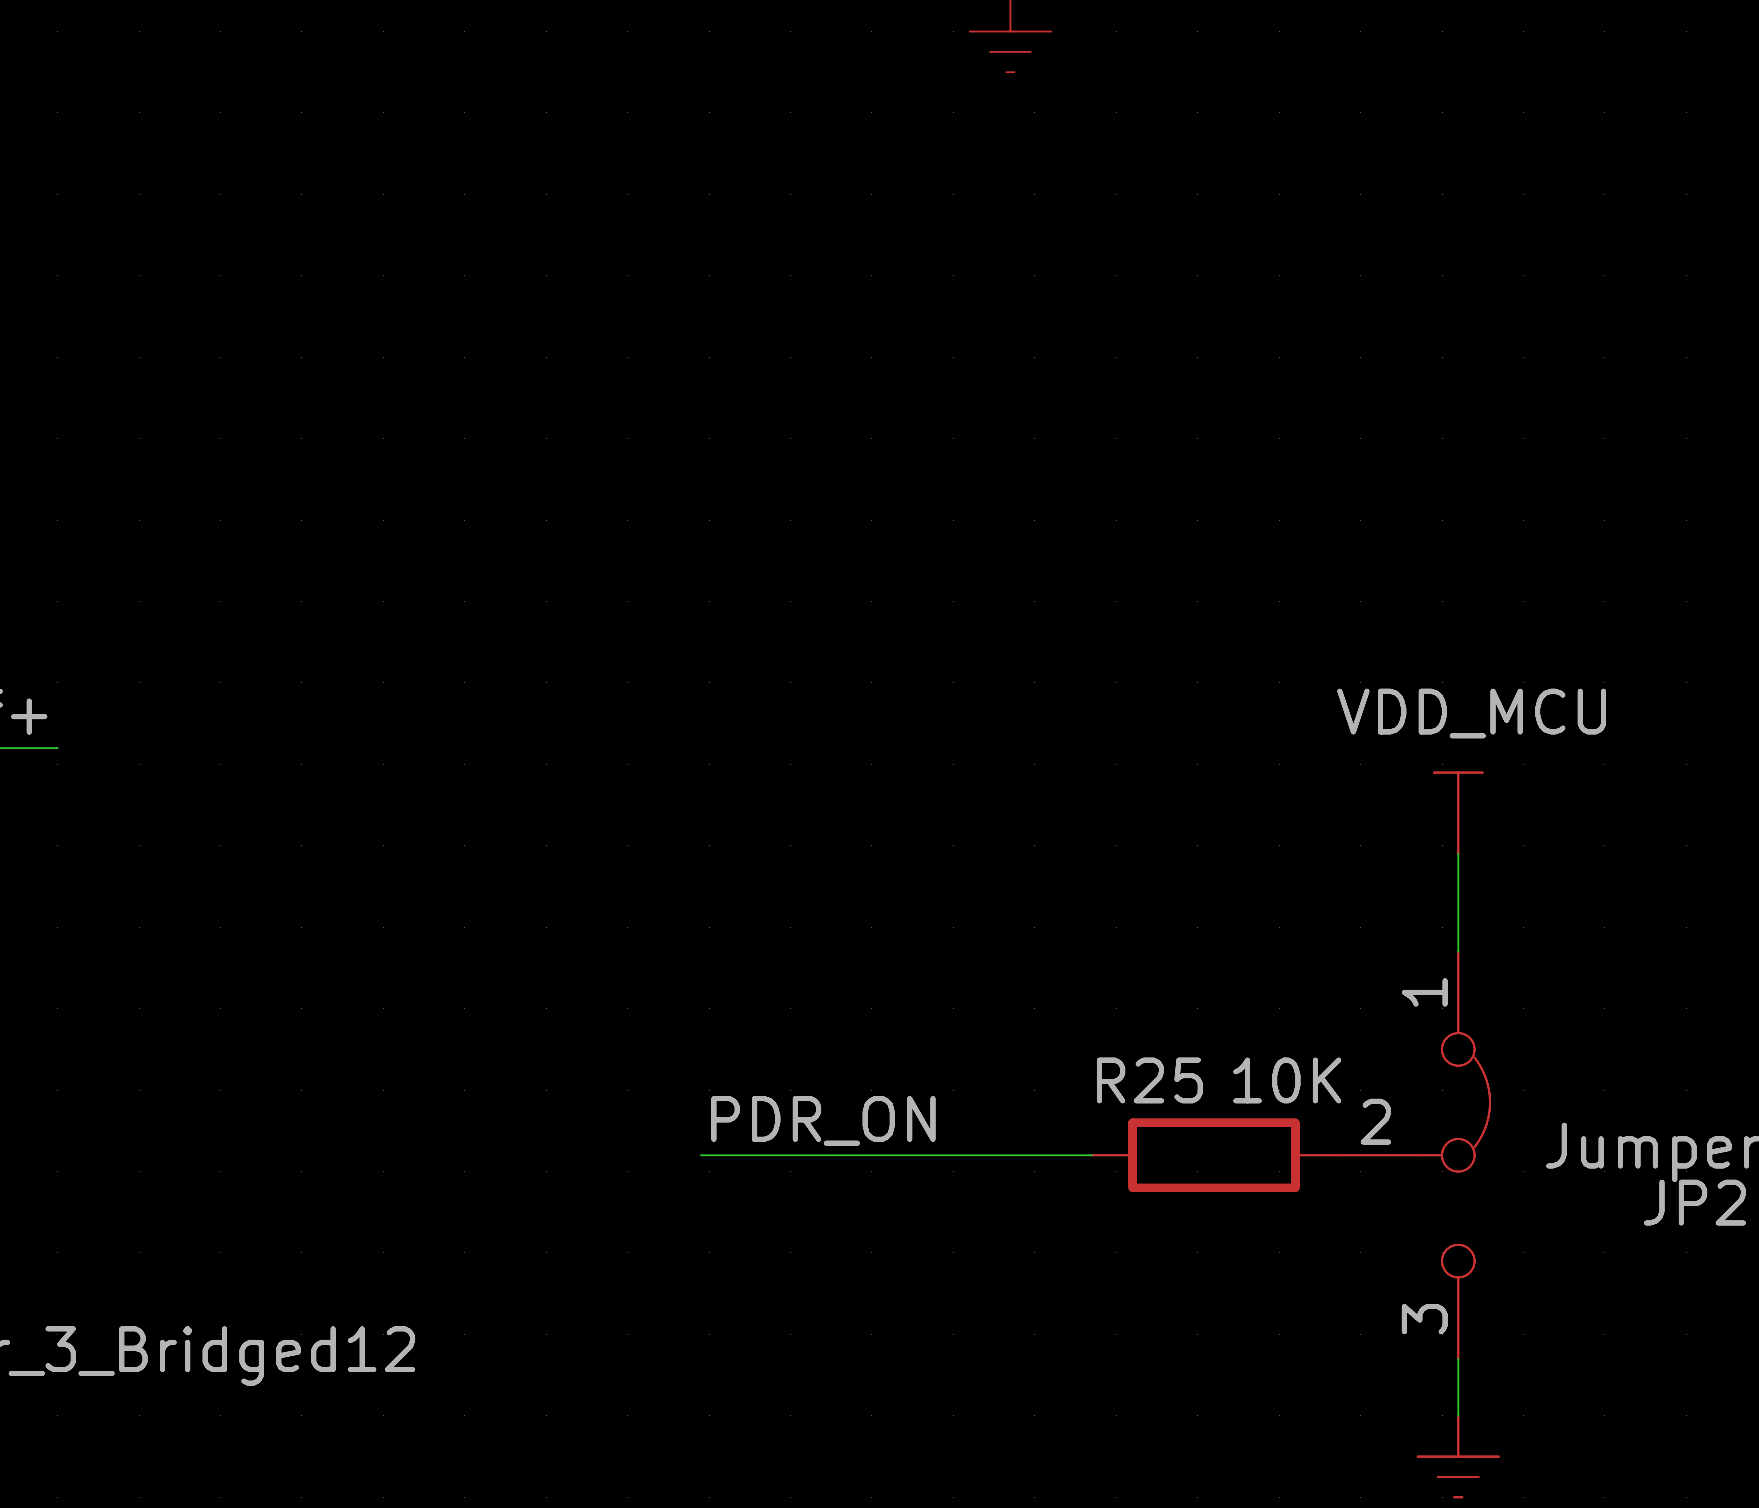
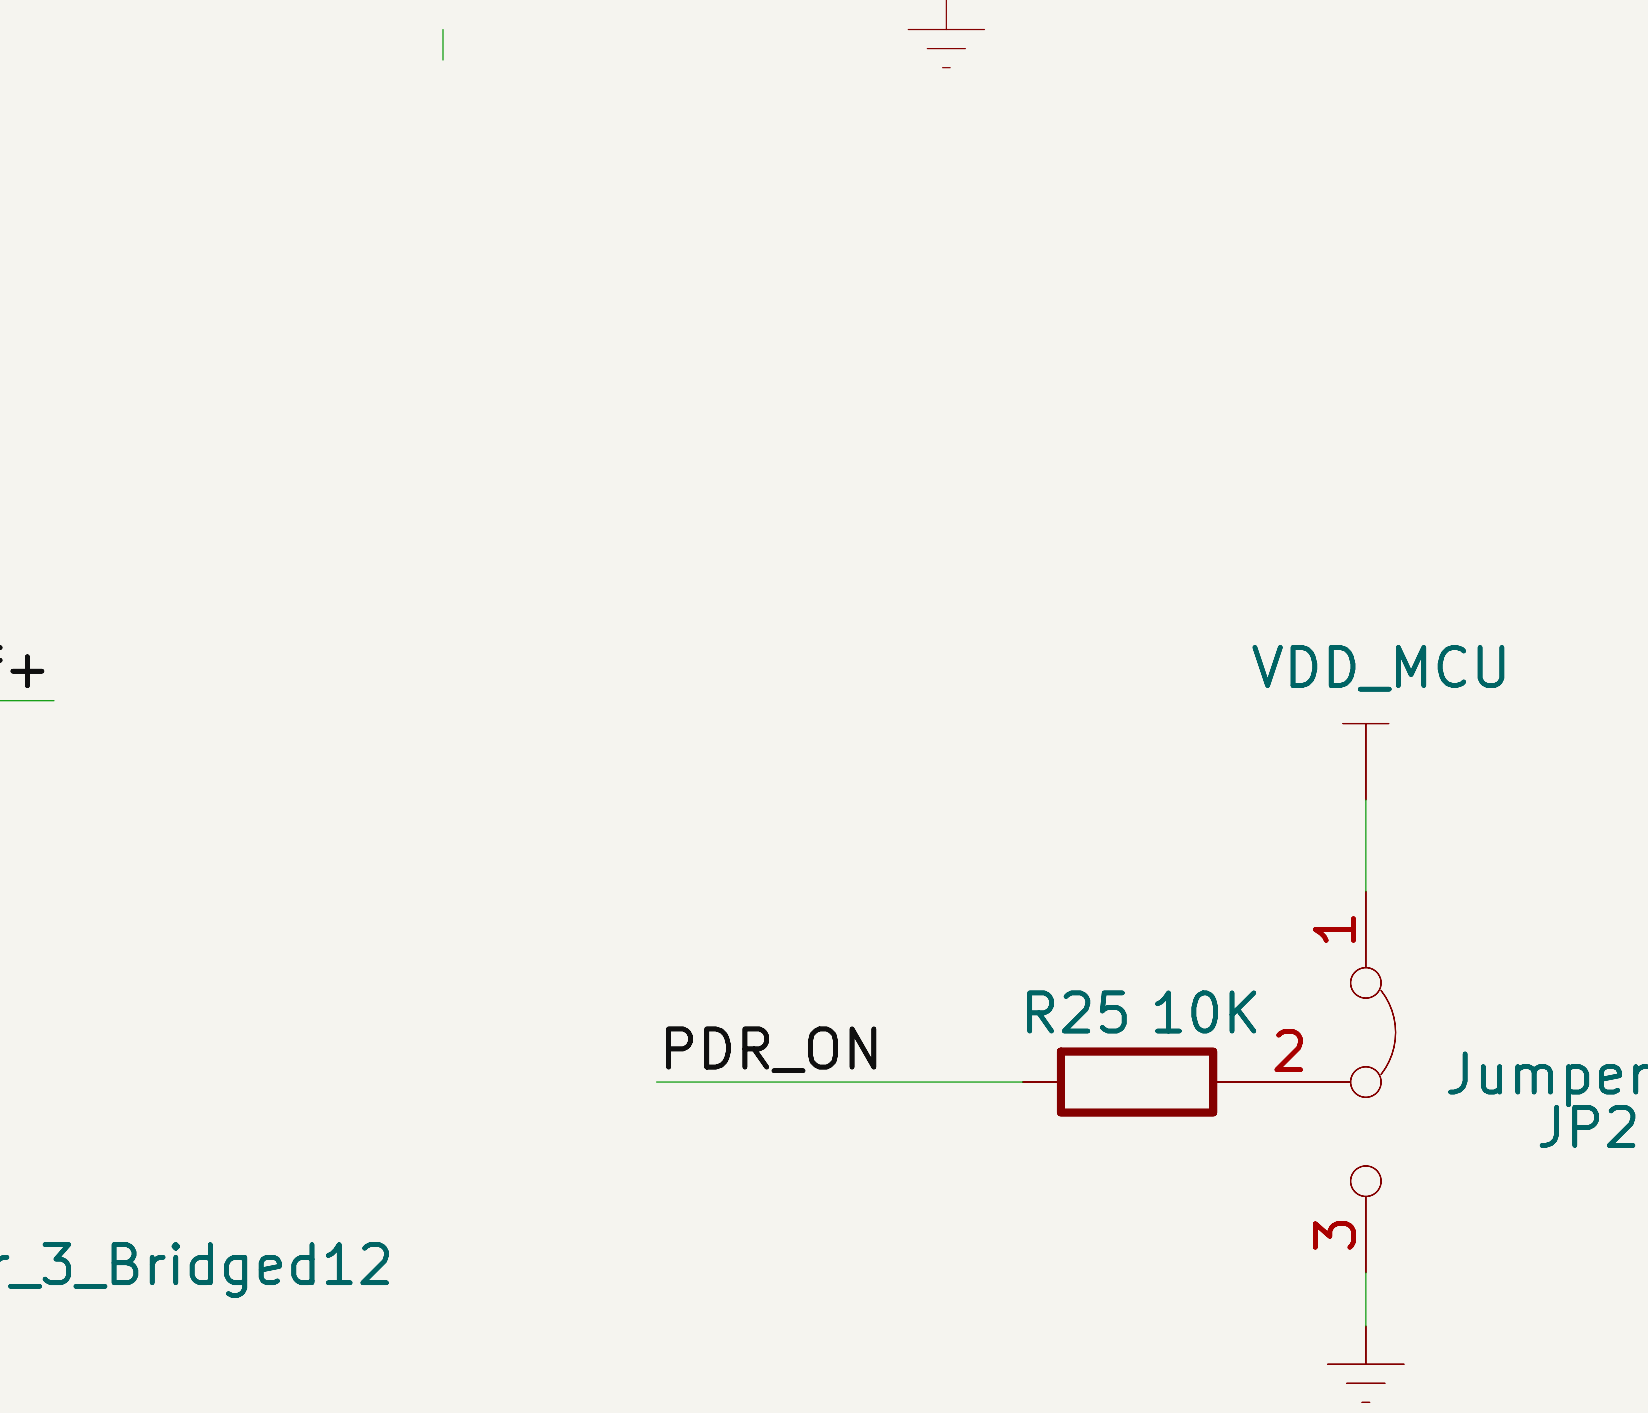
wire: none -> (442, 29) (442, 60)

